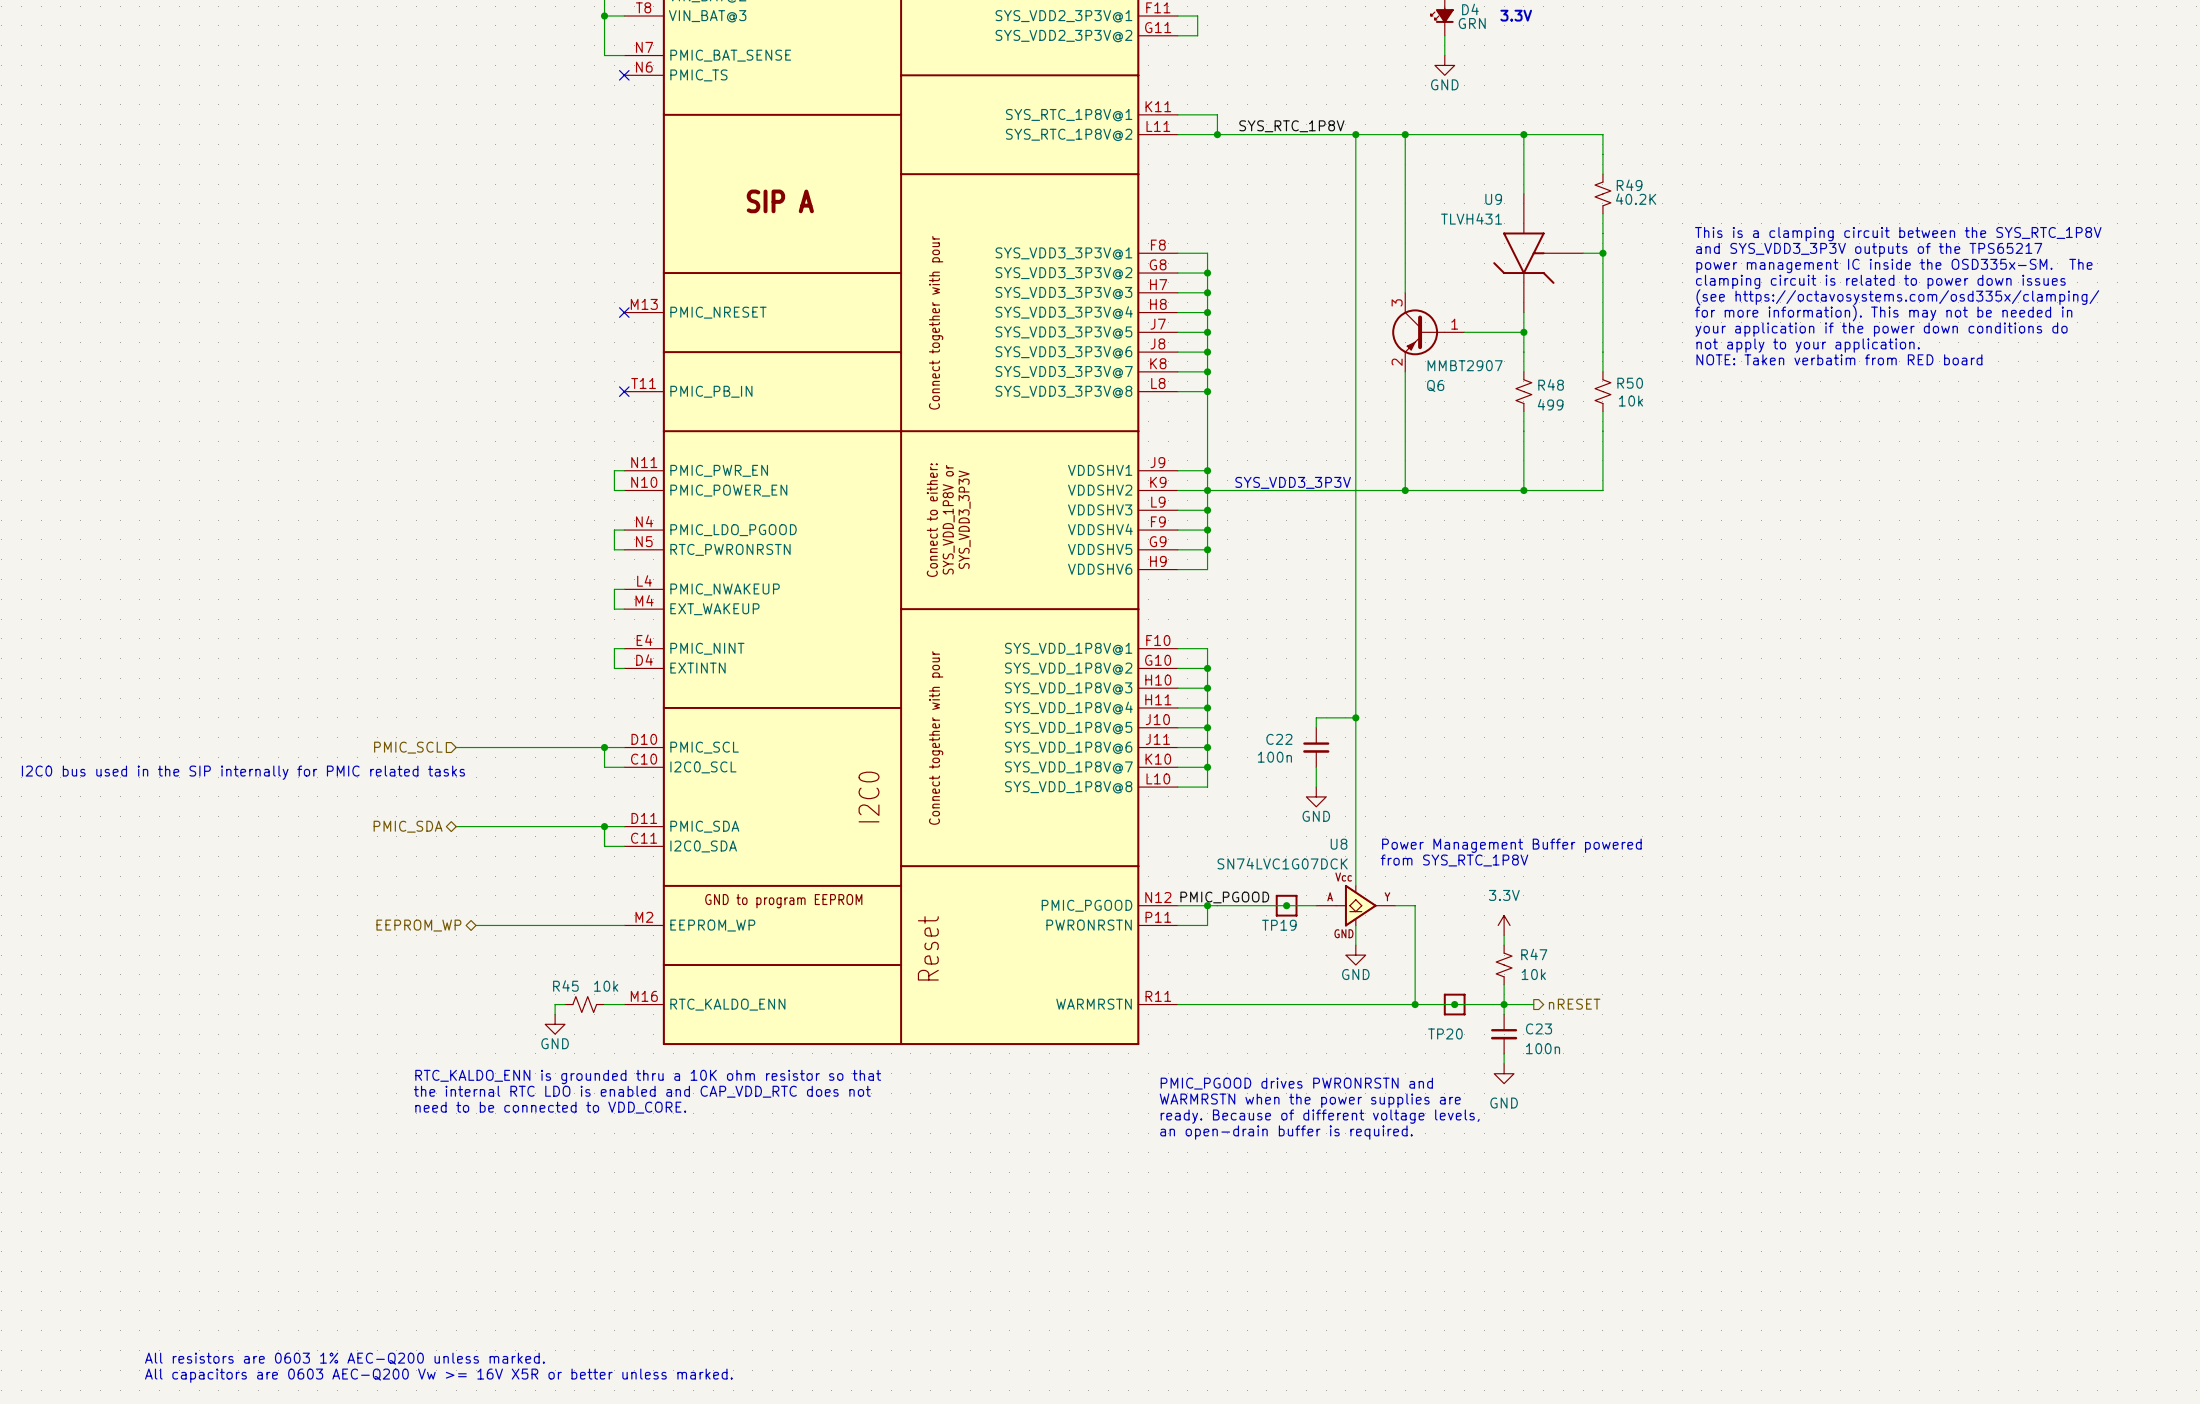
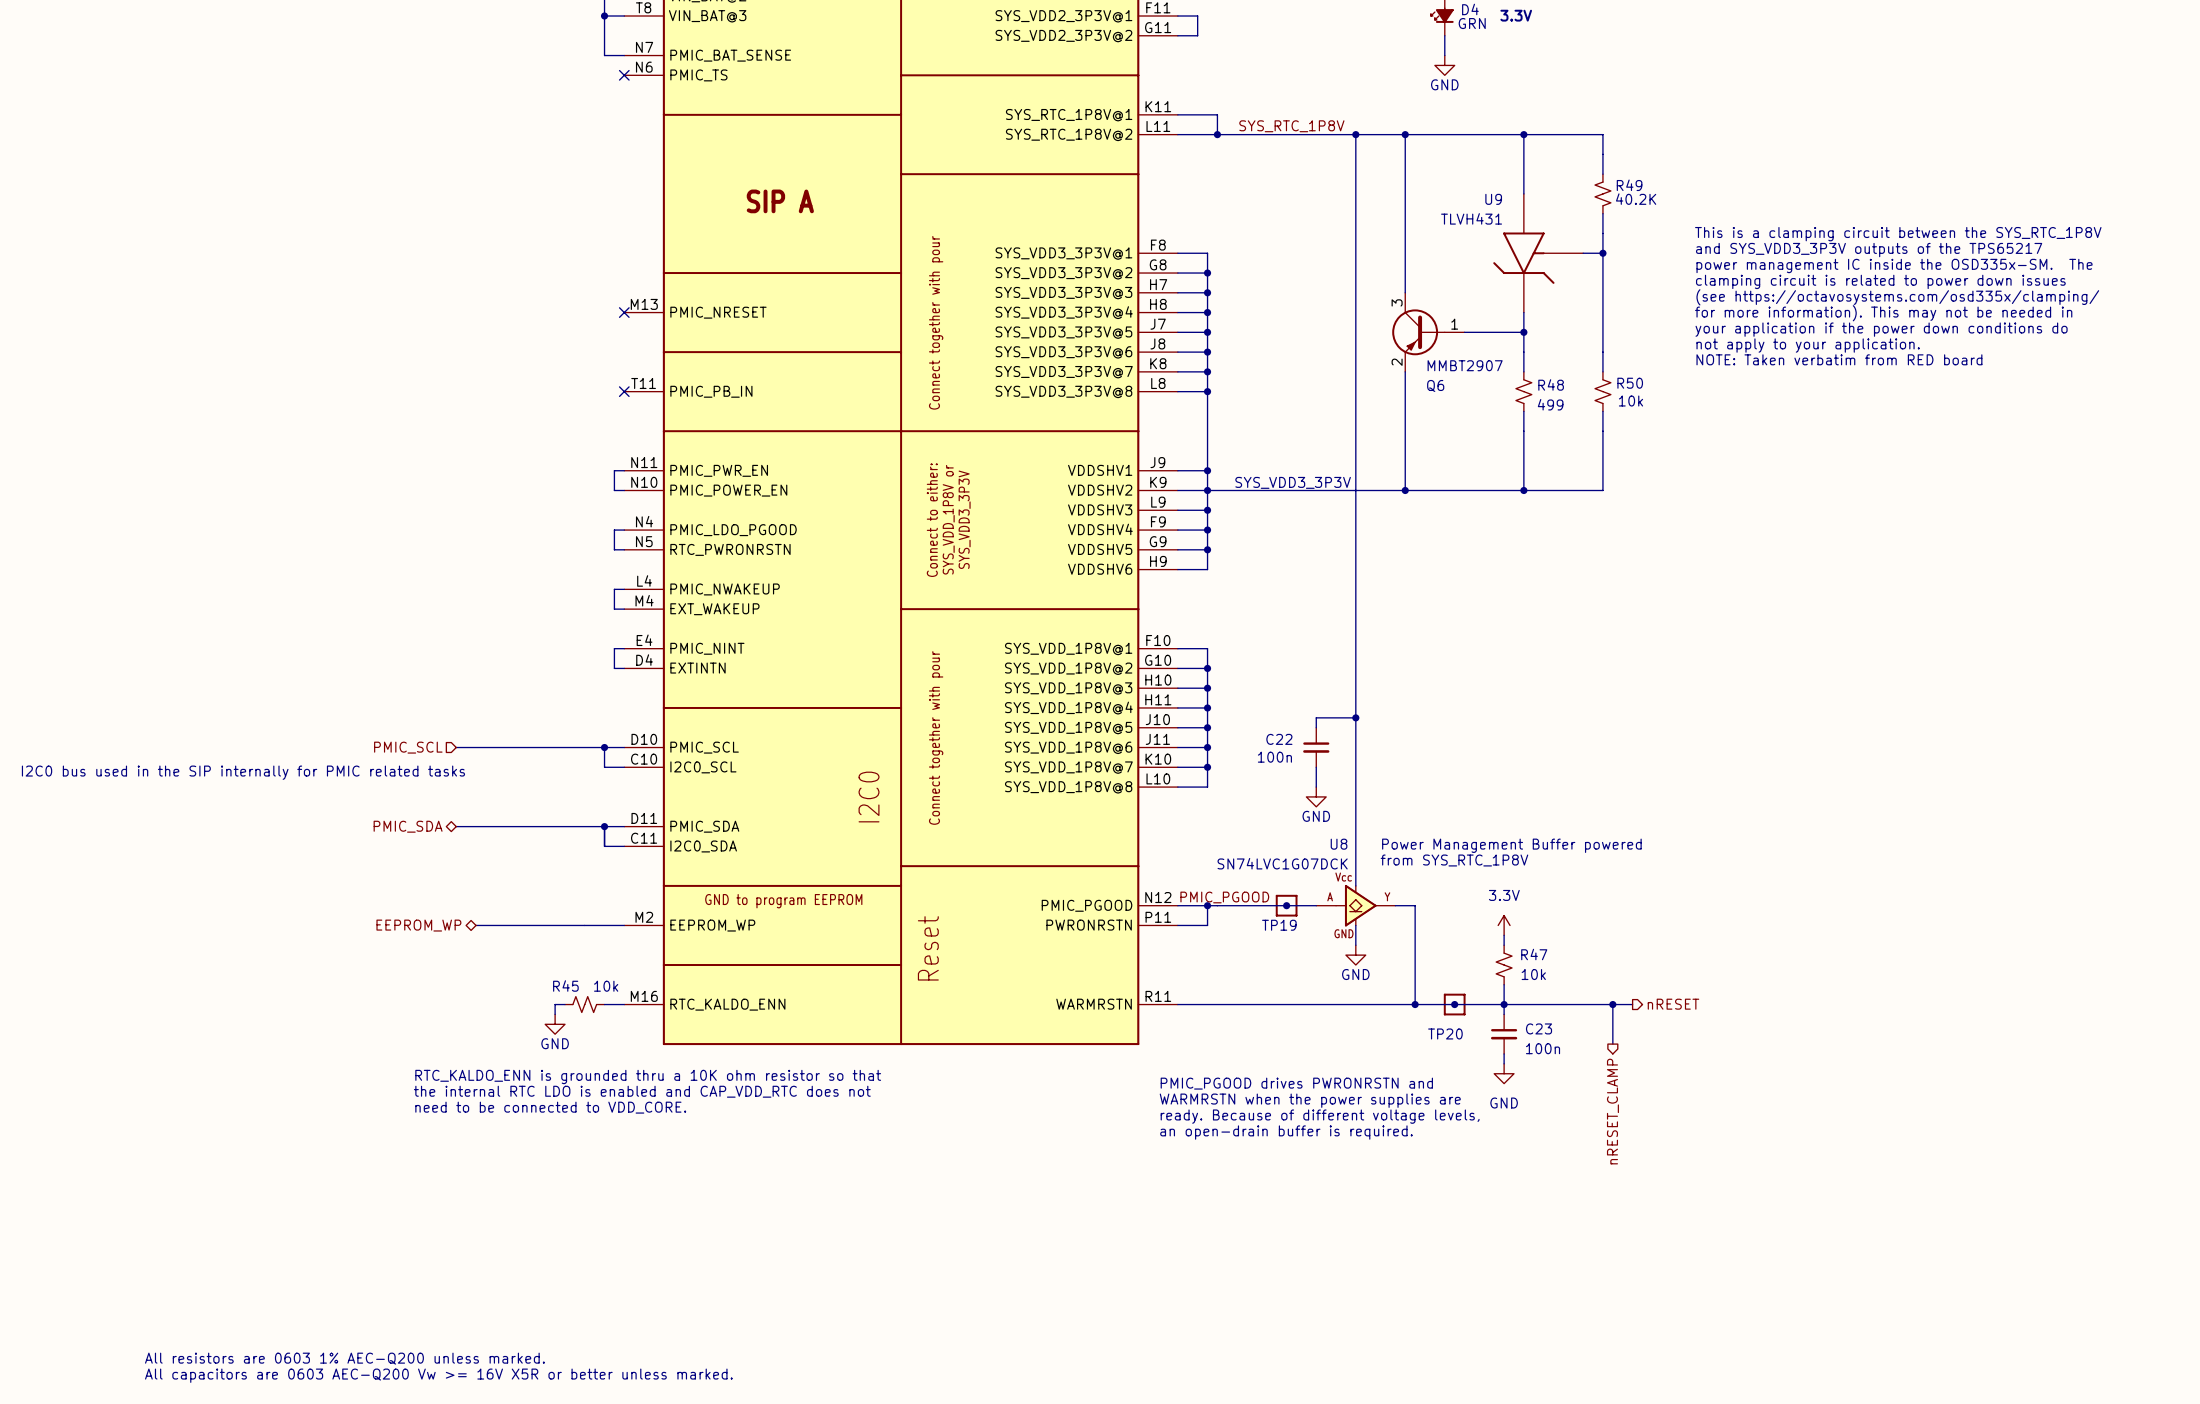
wire: none -> (1533, 1004) (1632, 1004)
hierarchical label position: nRESET (1574, 1004) -> nRESET (1673, 1004)
wire: none -> (1612, 1004) (1612, 1044)
junction: none -> (1612, 1004)
hierarchical label: none -> nRESET_CLAMP (1612, 1111)

